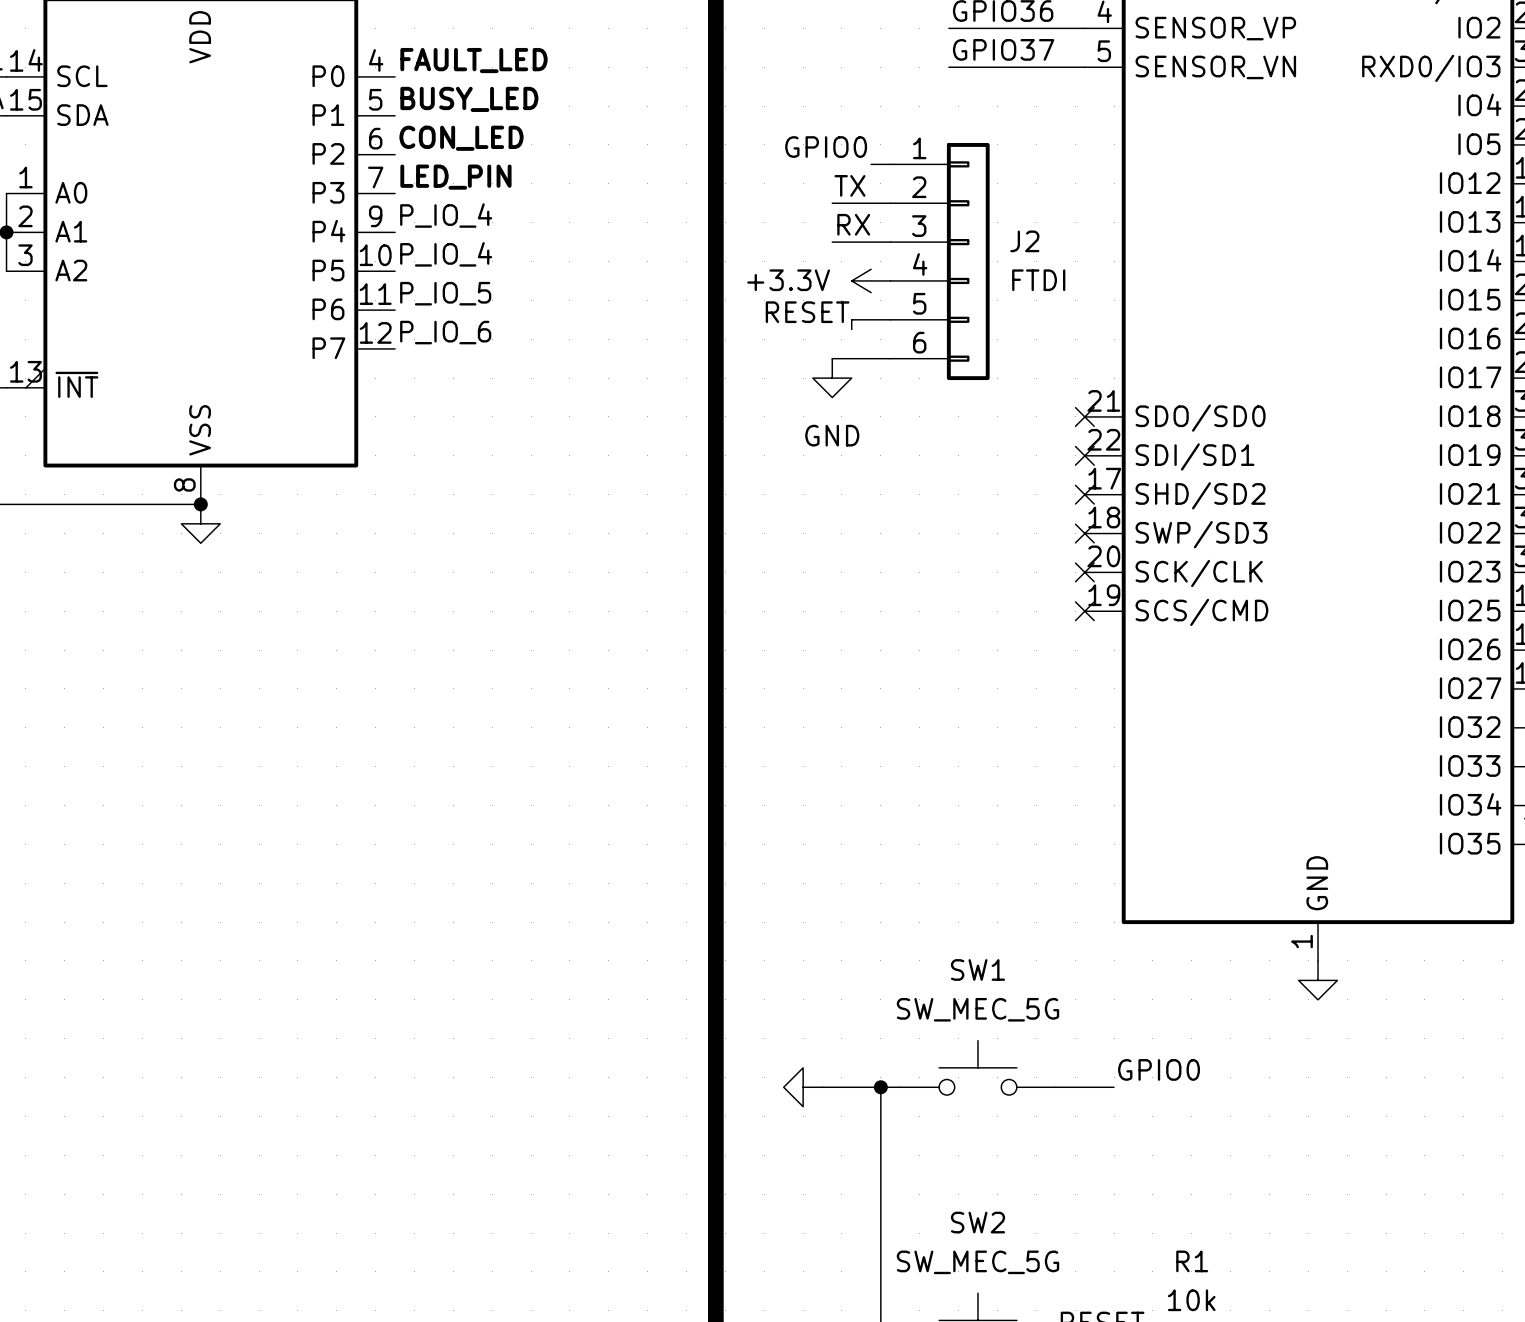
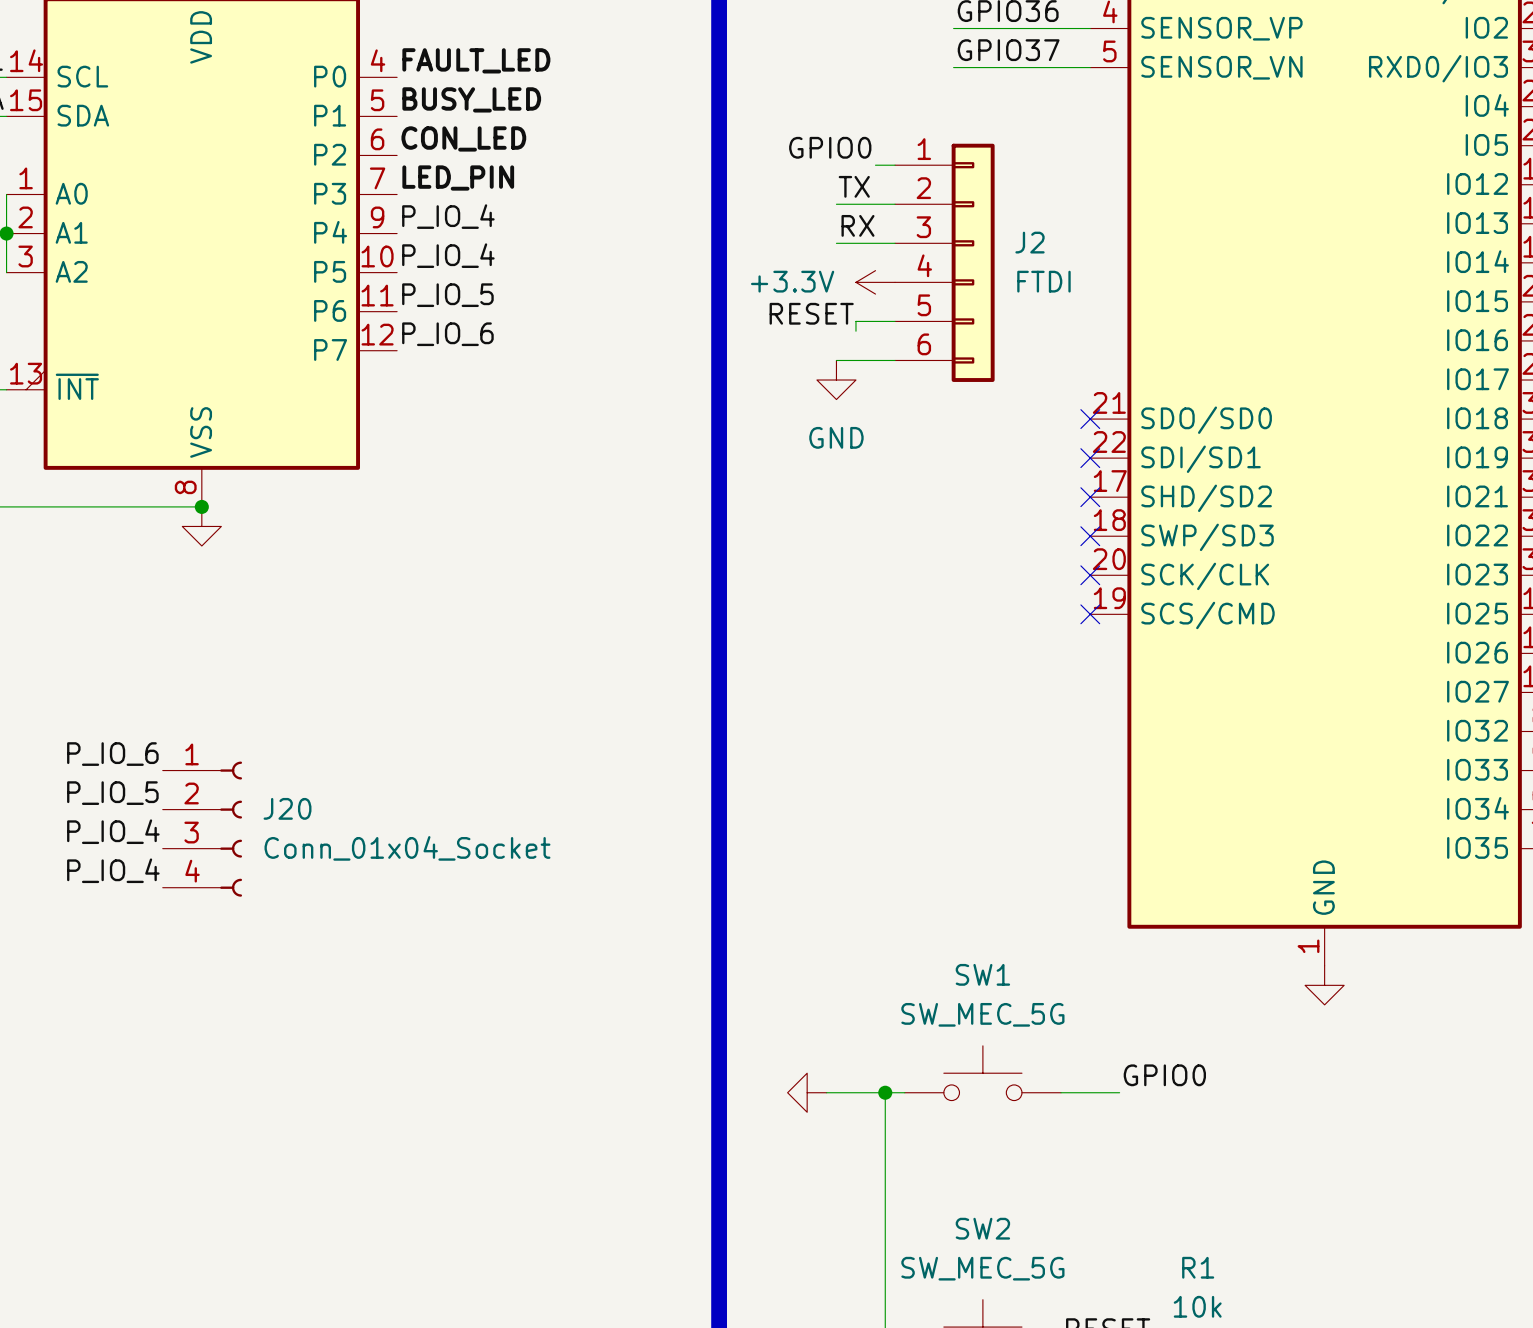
label: none -> P_IO_6 (112, 754)
label: none -> P_IO_5 (112, 793)
J20: none -> Conn_01x04_Socket (202, 829)
label: none -> P_IO_4 (113, 831)
label: none -> P_IO_4 (113, 870)

